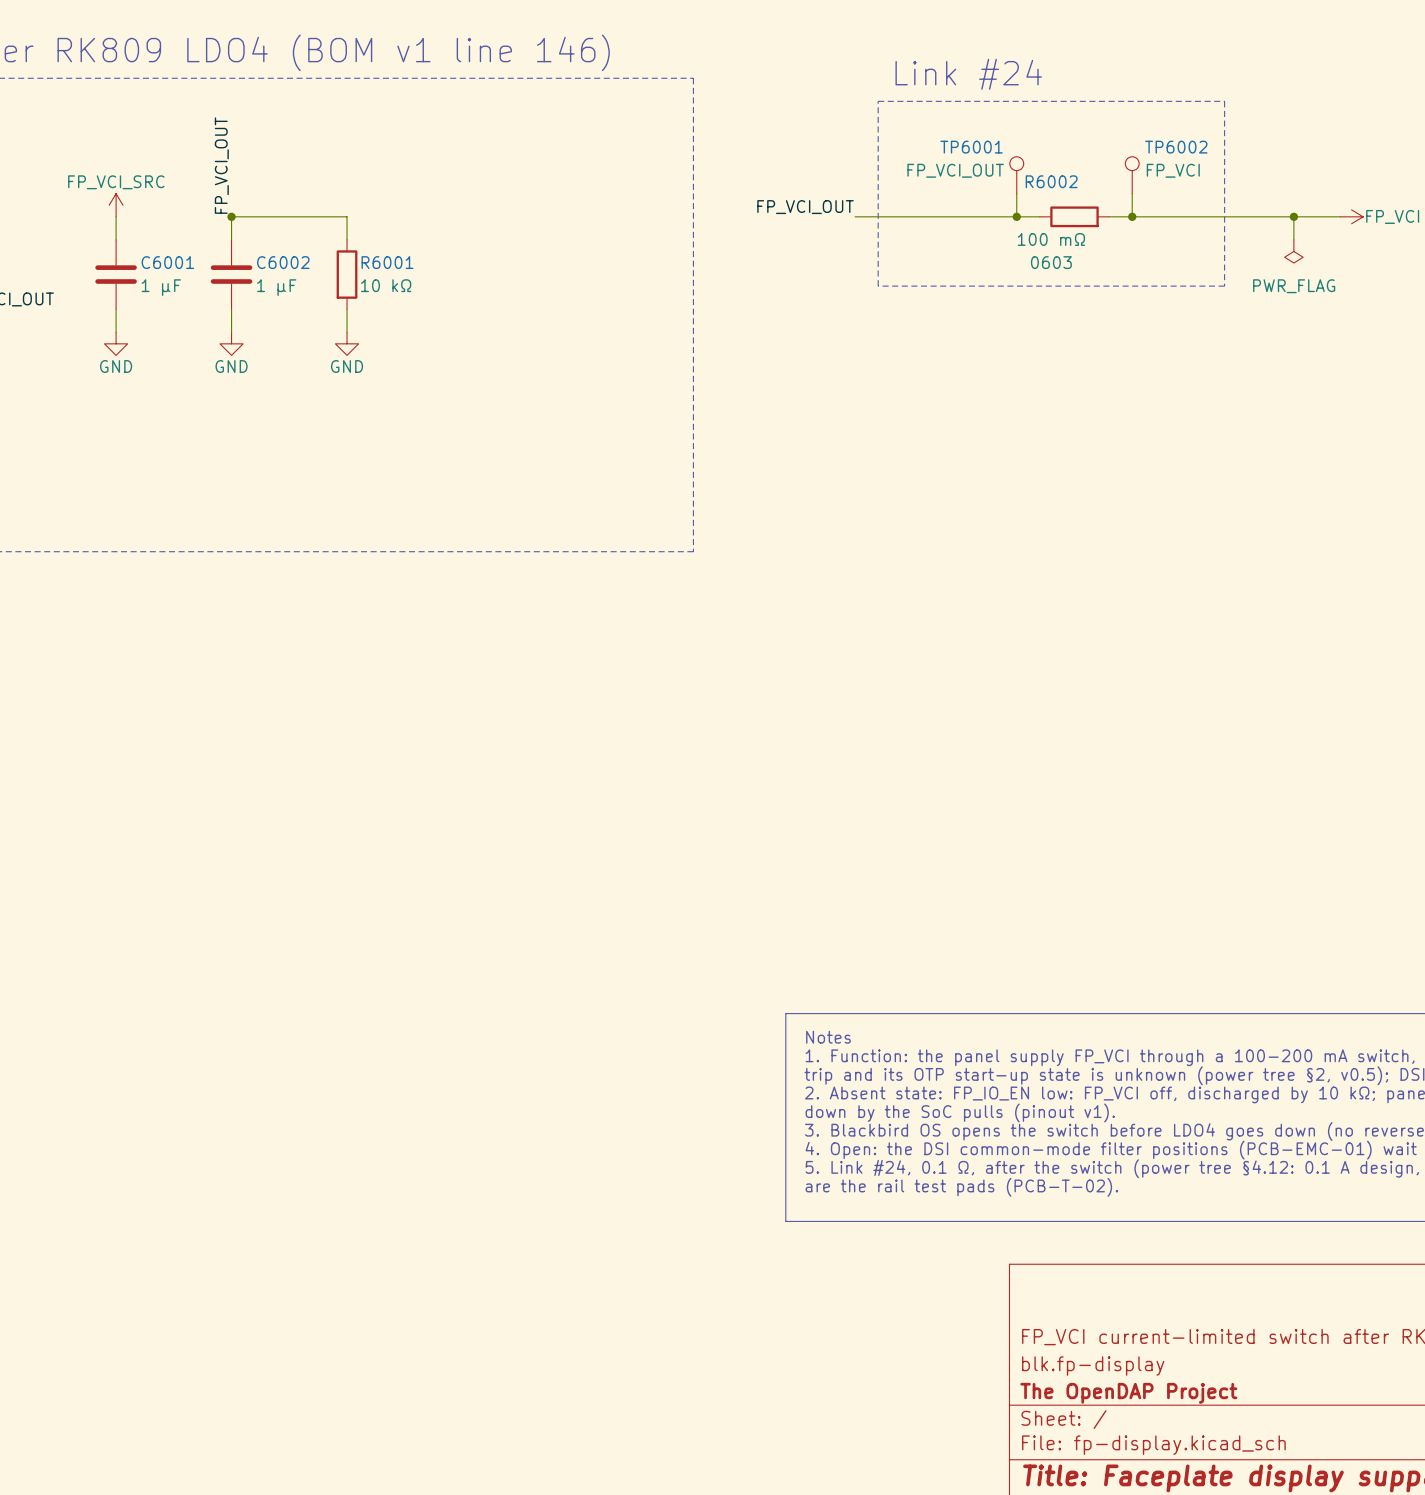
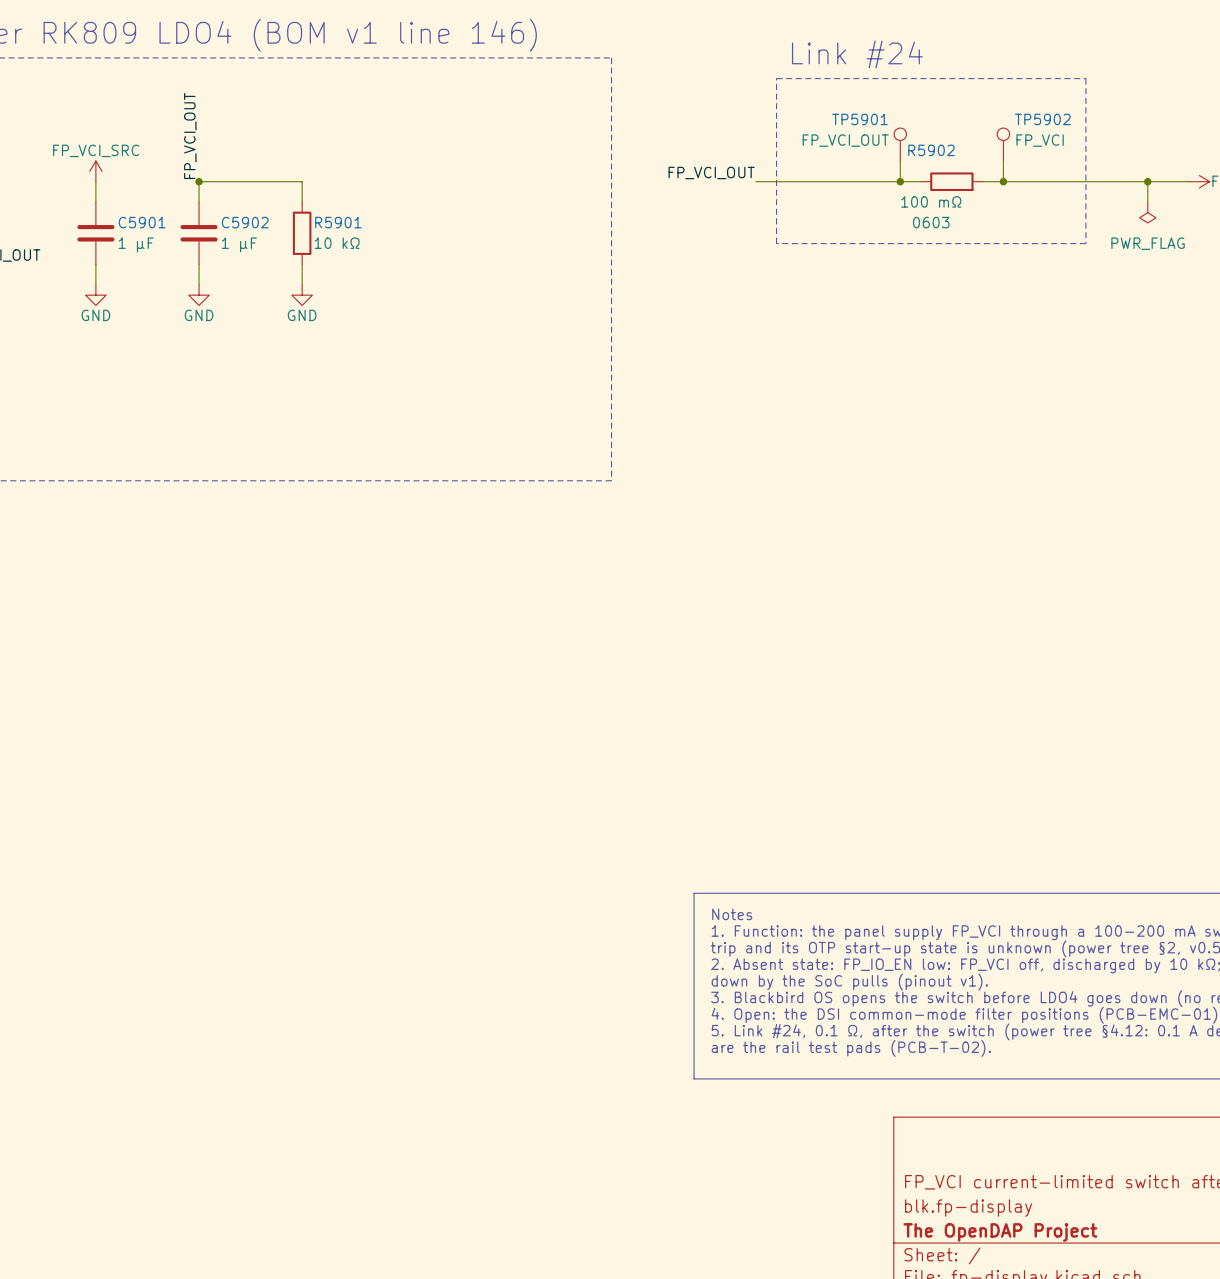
TP6001 name: TP6001 (971, 147) -> TP5901 (859, 119)
TP6002 name: TP6002 (1176, 147) -> TP5902 (1042, 119)
R6002 name: R6002 (1051, 181) -> R5902 (931, 150)
C6001 name: C6001 (167, 262) -> C5901 (142, 222)
C6002 name: C6002 (283, 262) -> C5902 (245, 222)
R6001 name: R6001 (387, 262) -> R5901 (338, 222)

